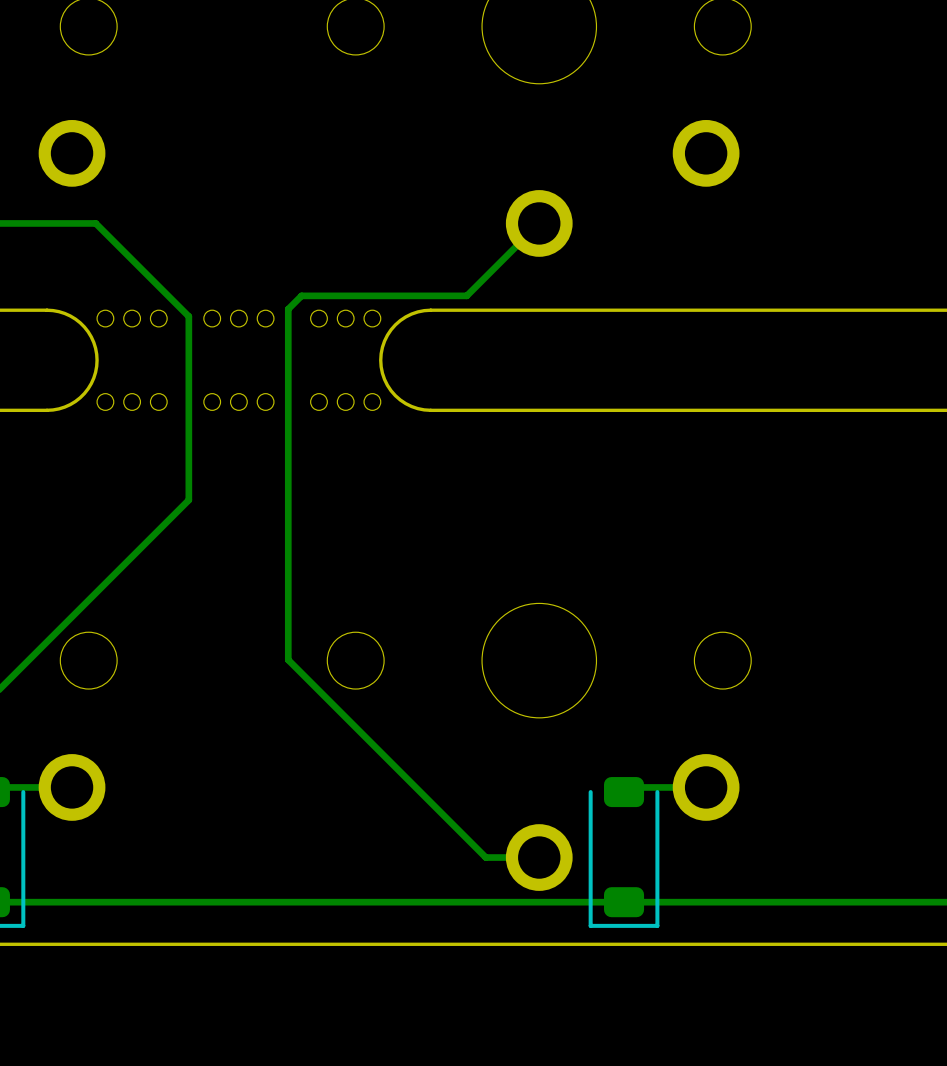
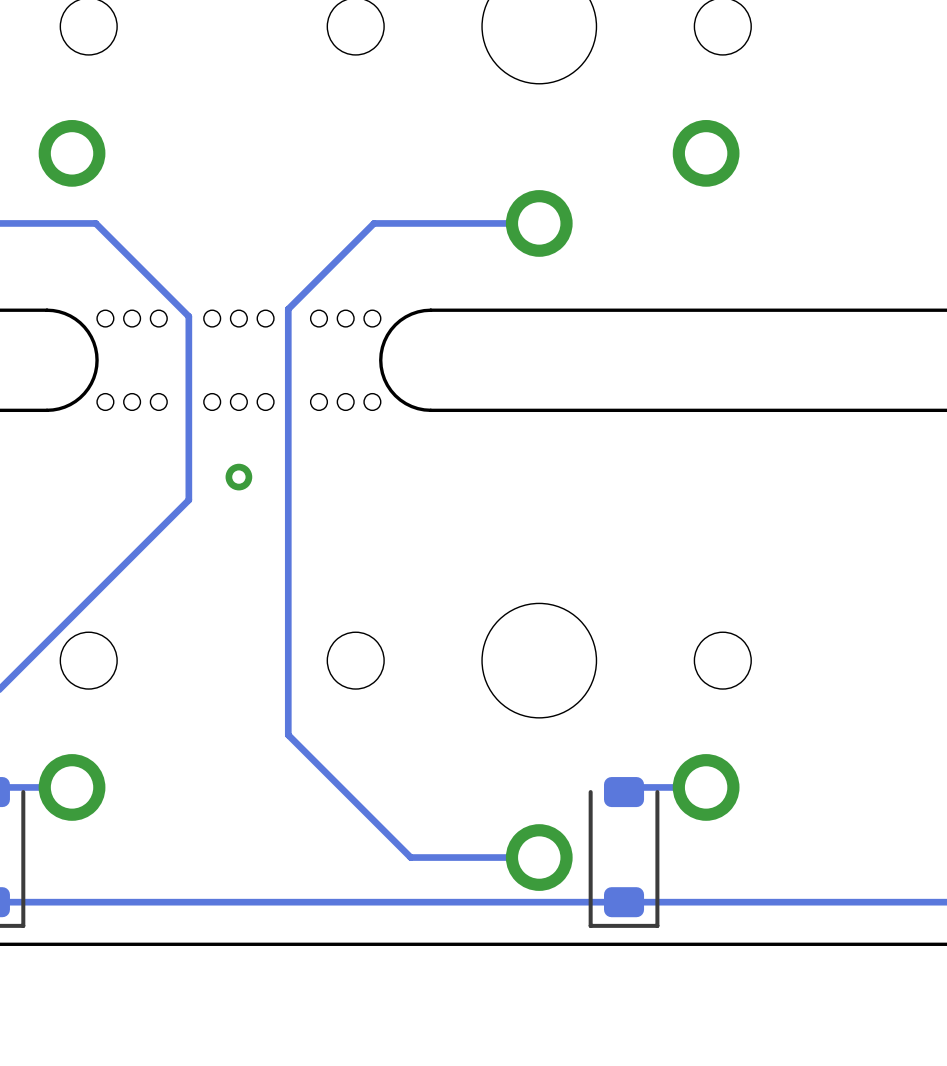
track: (539, 223) (466, 295) (301, 295) -> (539, 223) (374, 223) (301, 295)
via: none -> (238, 477)
track: (288, 659) (485, 857) -> (288, 659) (288, 735) (410, 857) (485, 857)

